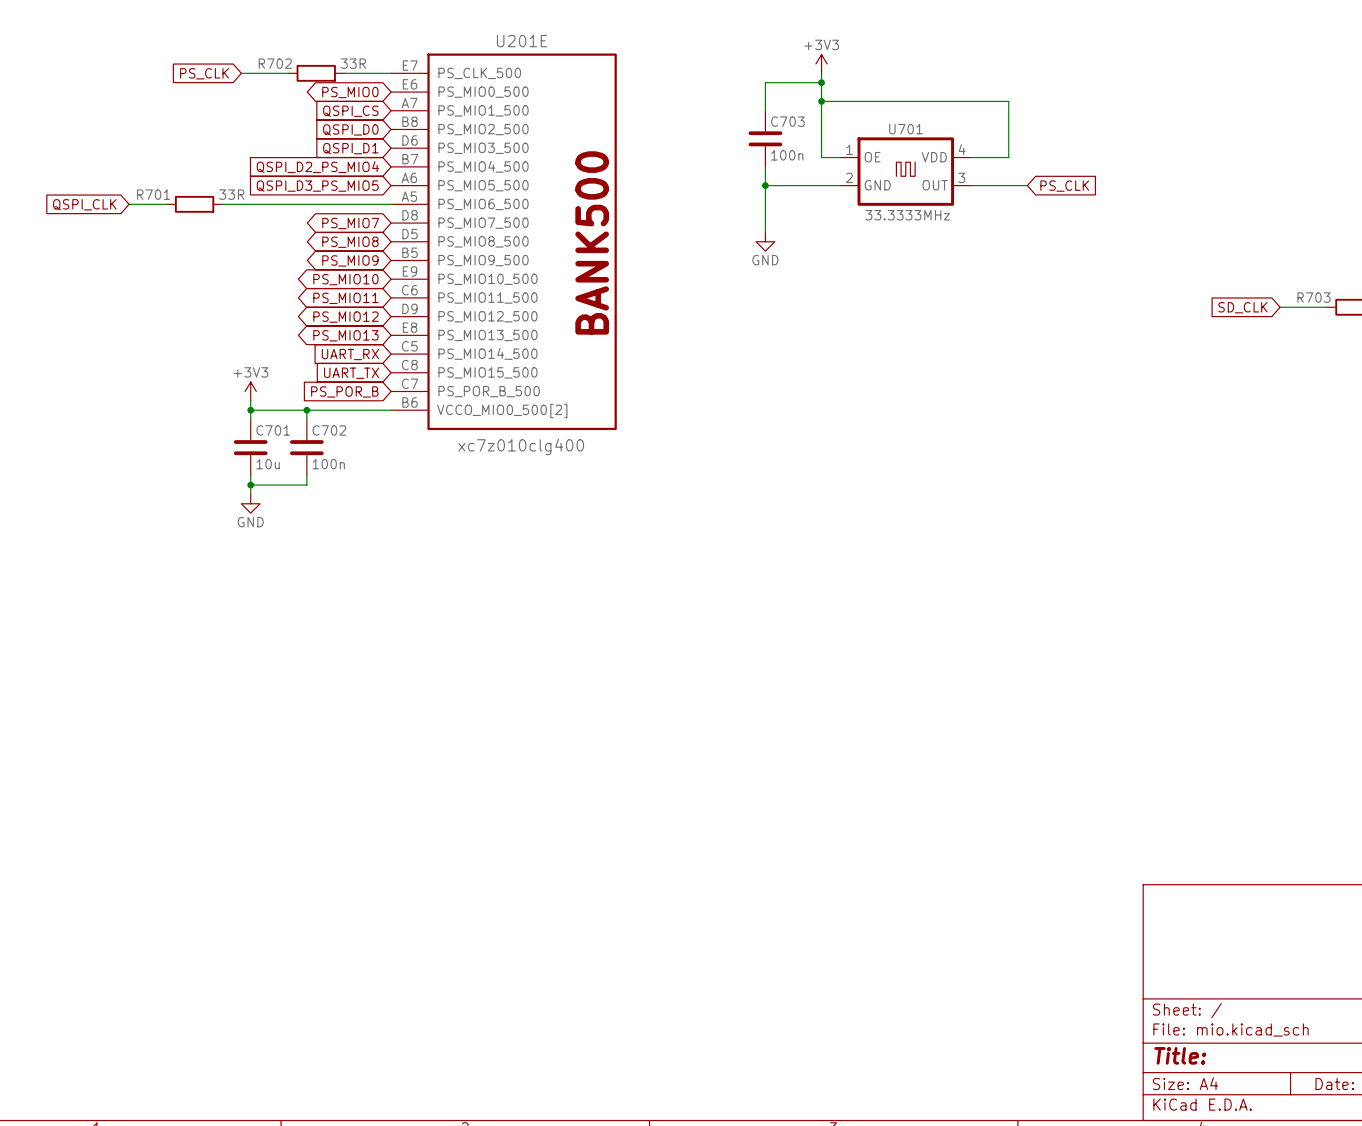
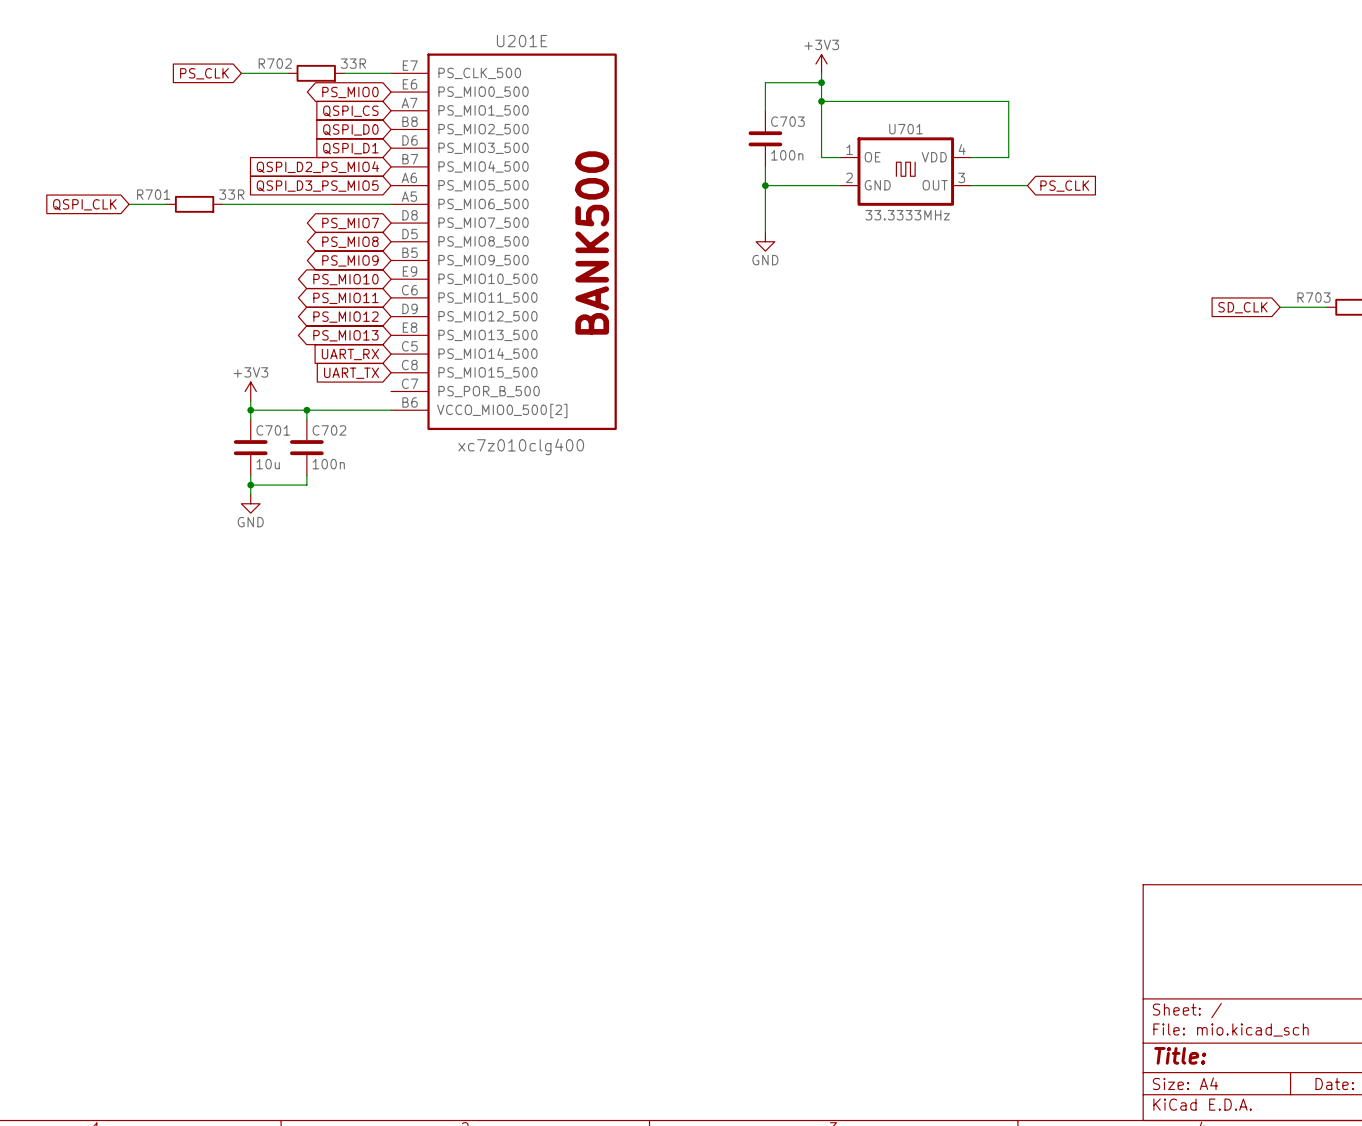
global label: PS_POR_B (344, 391) -> none

